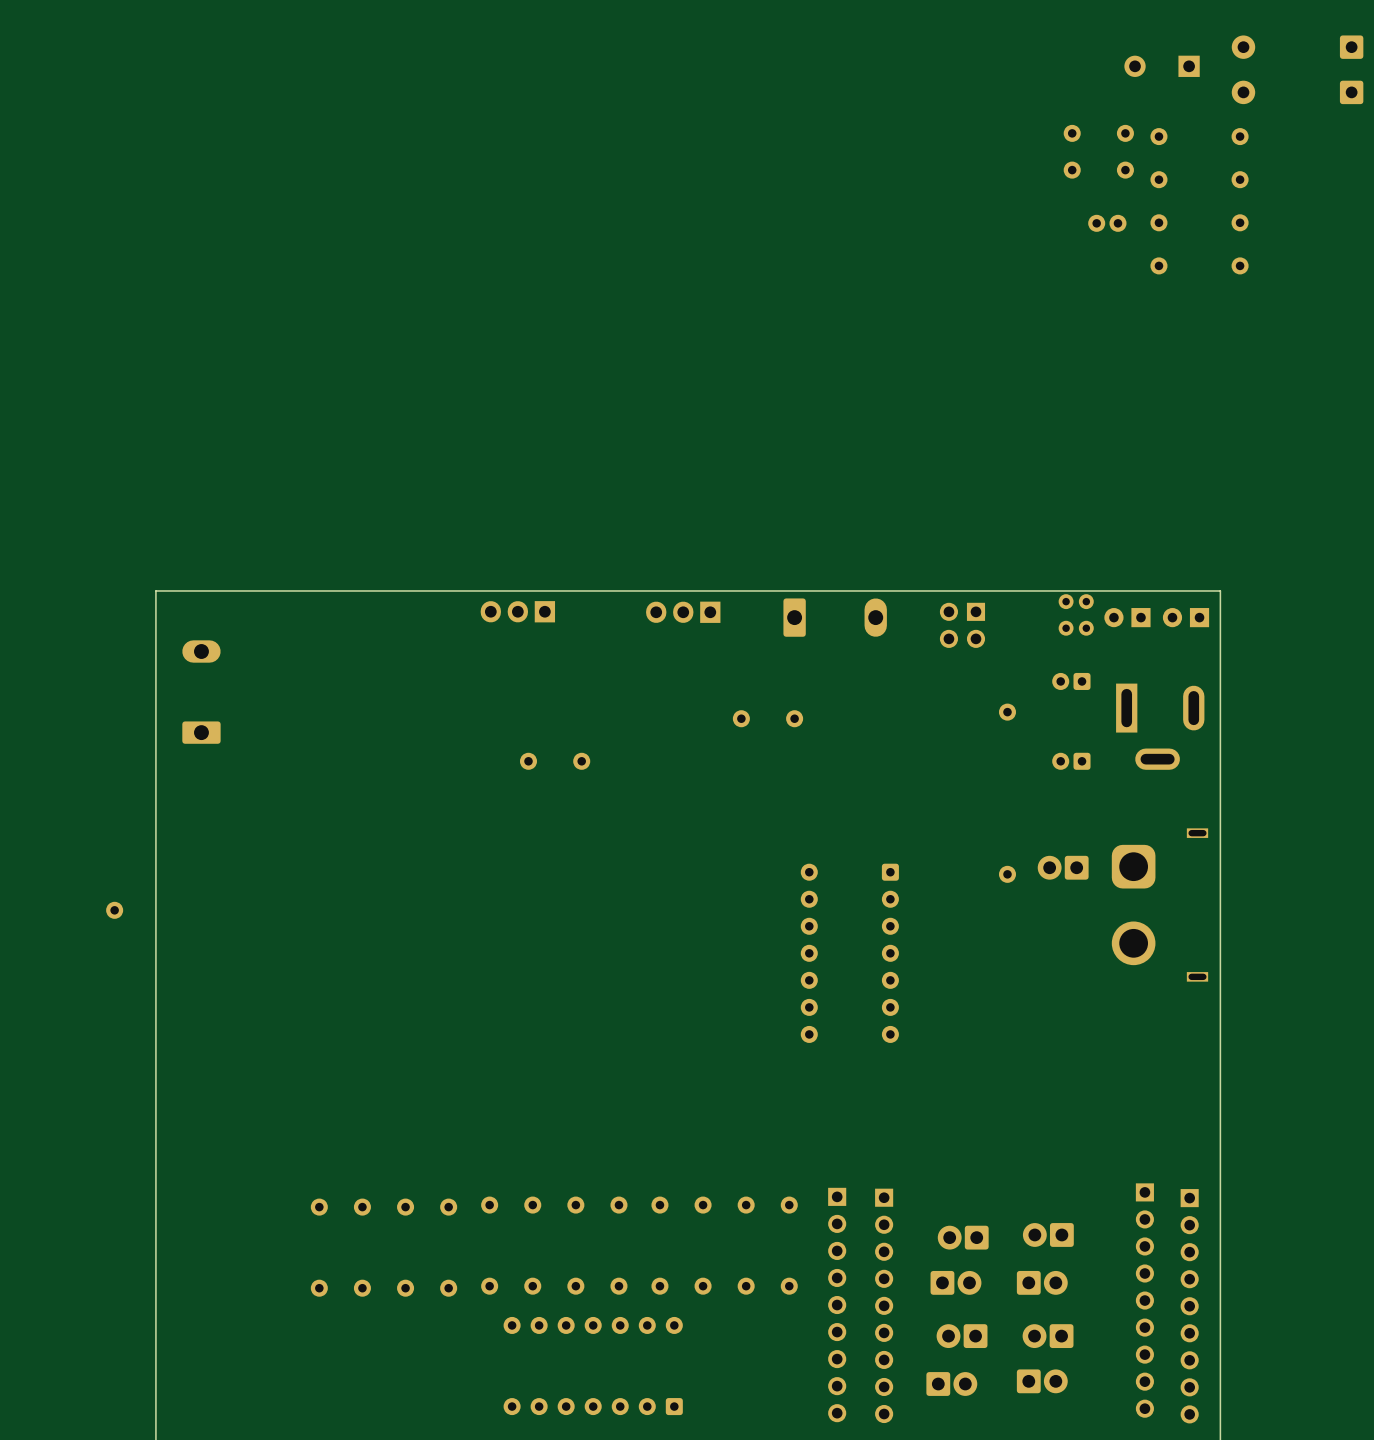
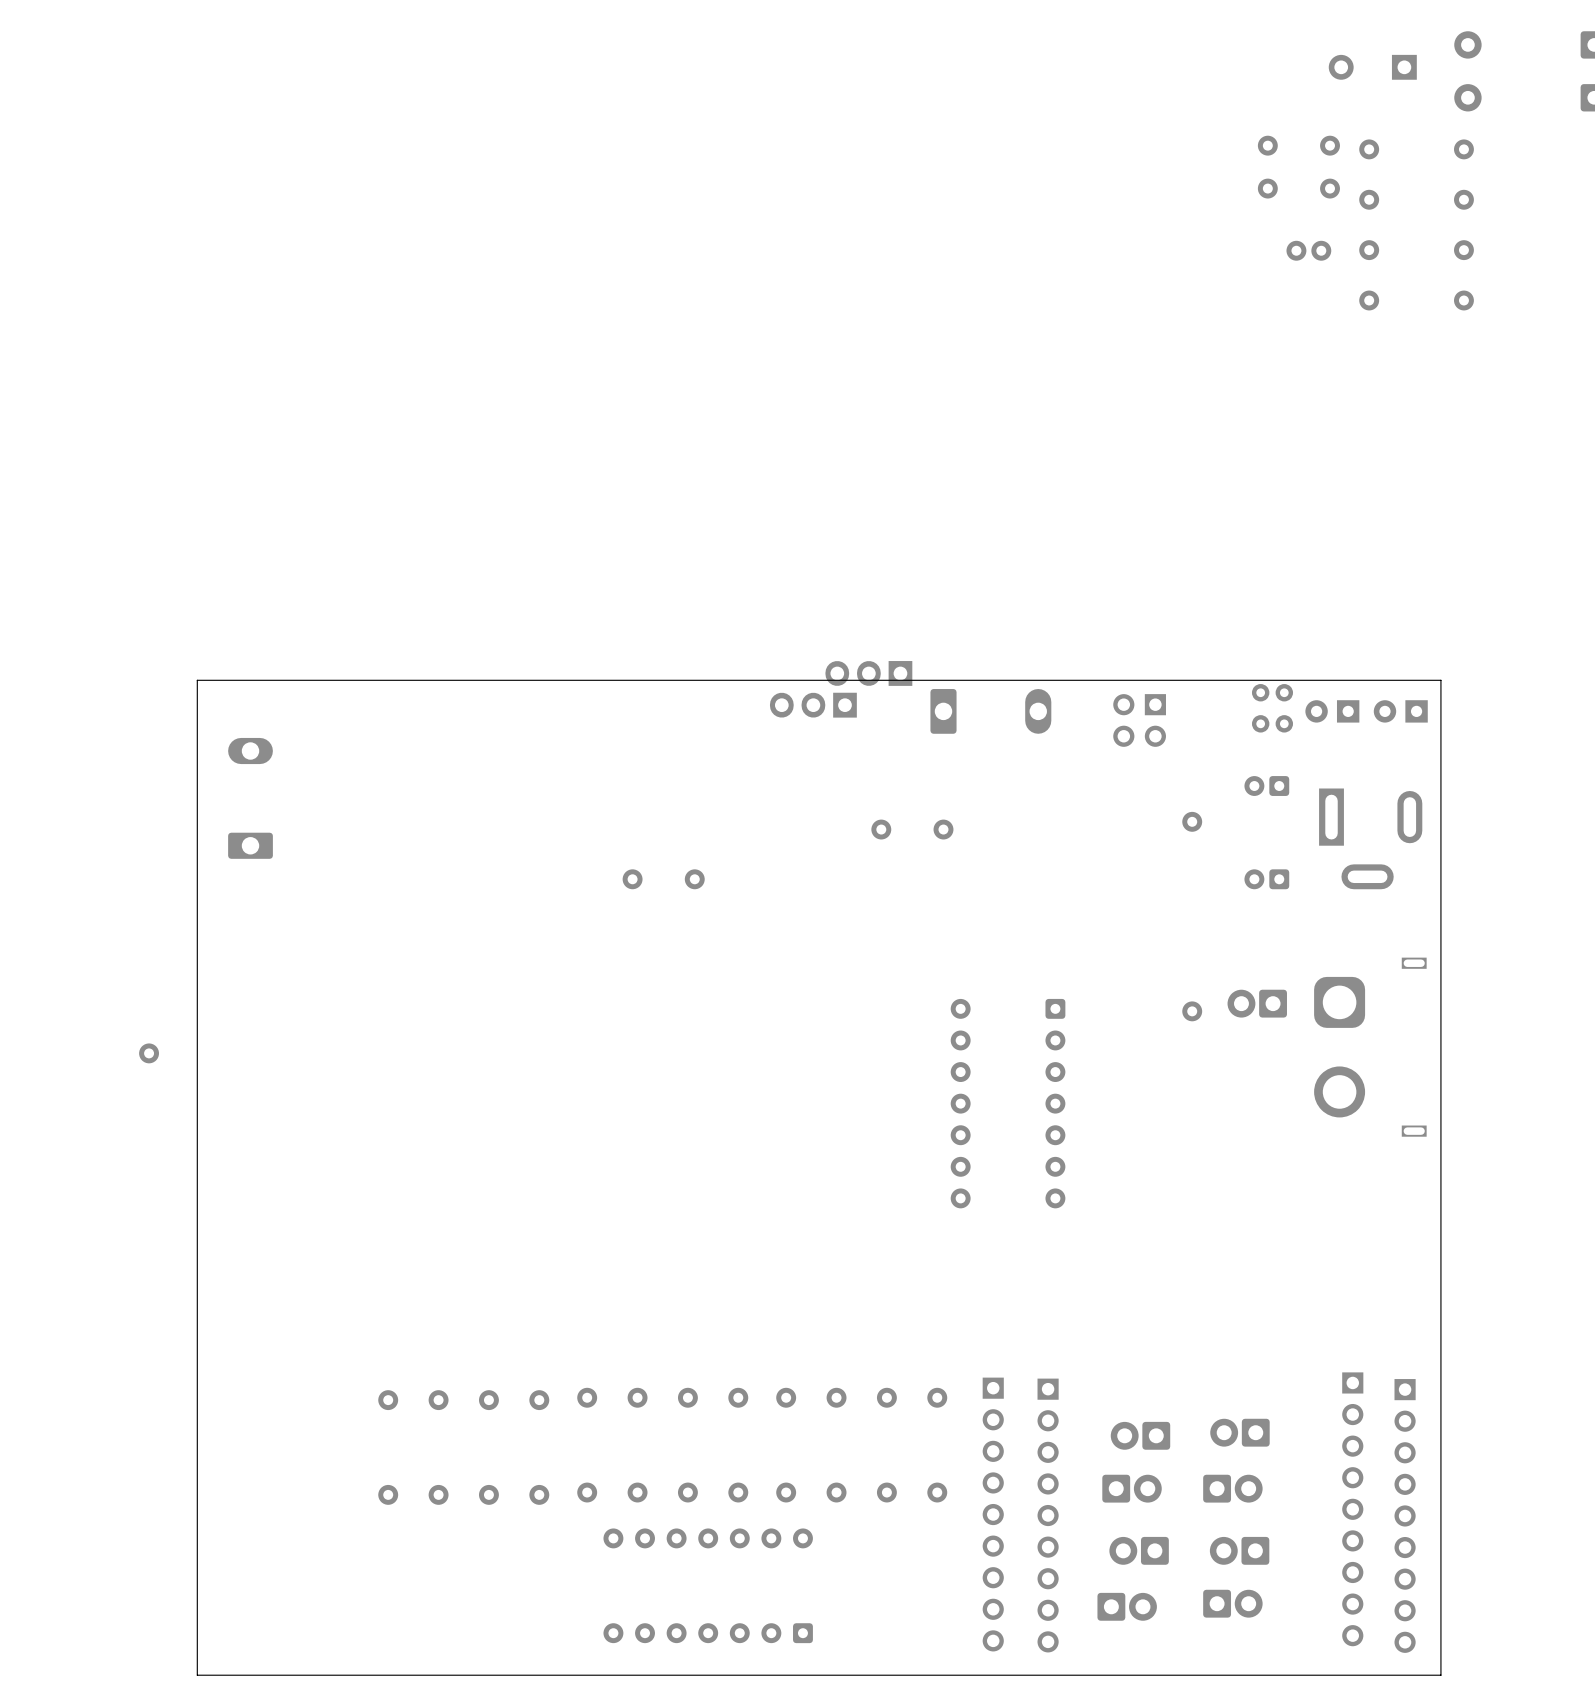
part position: (517, 611) -> (868, 673)

